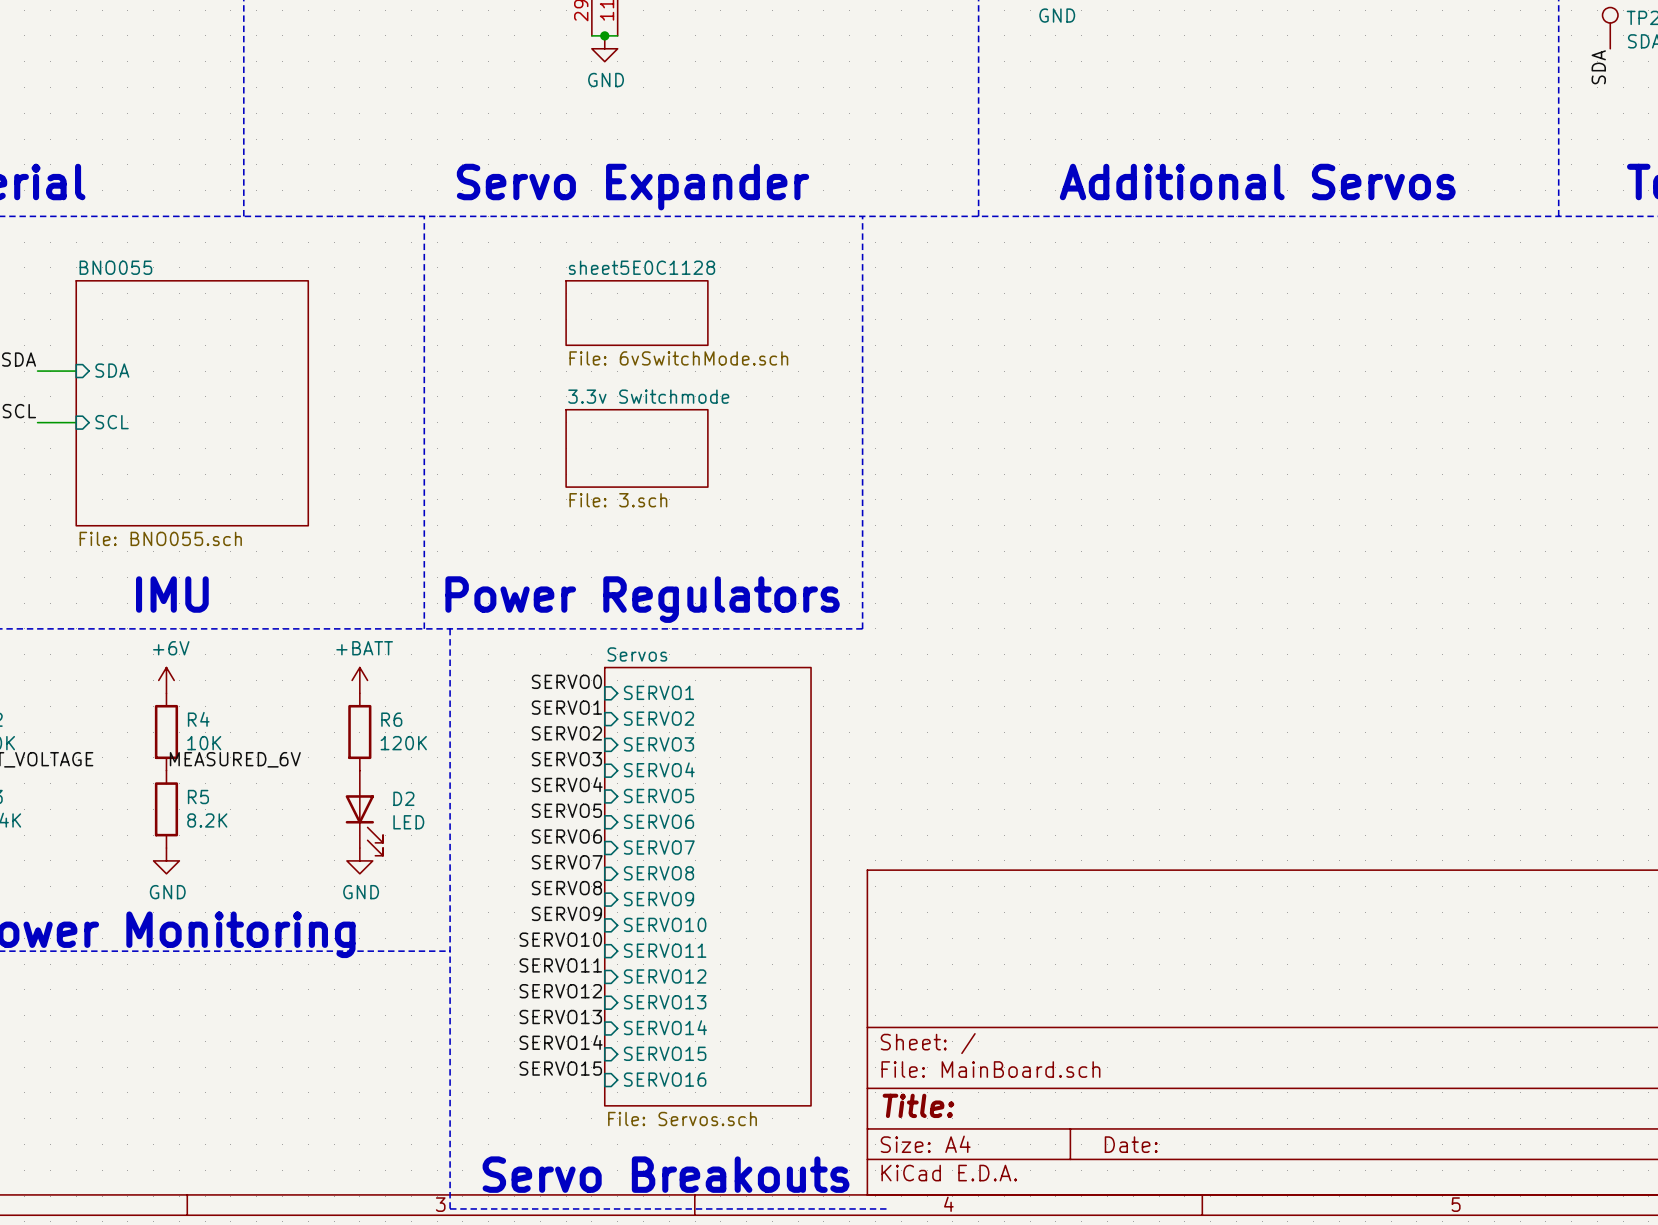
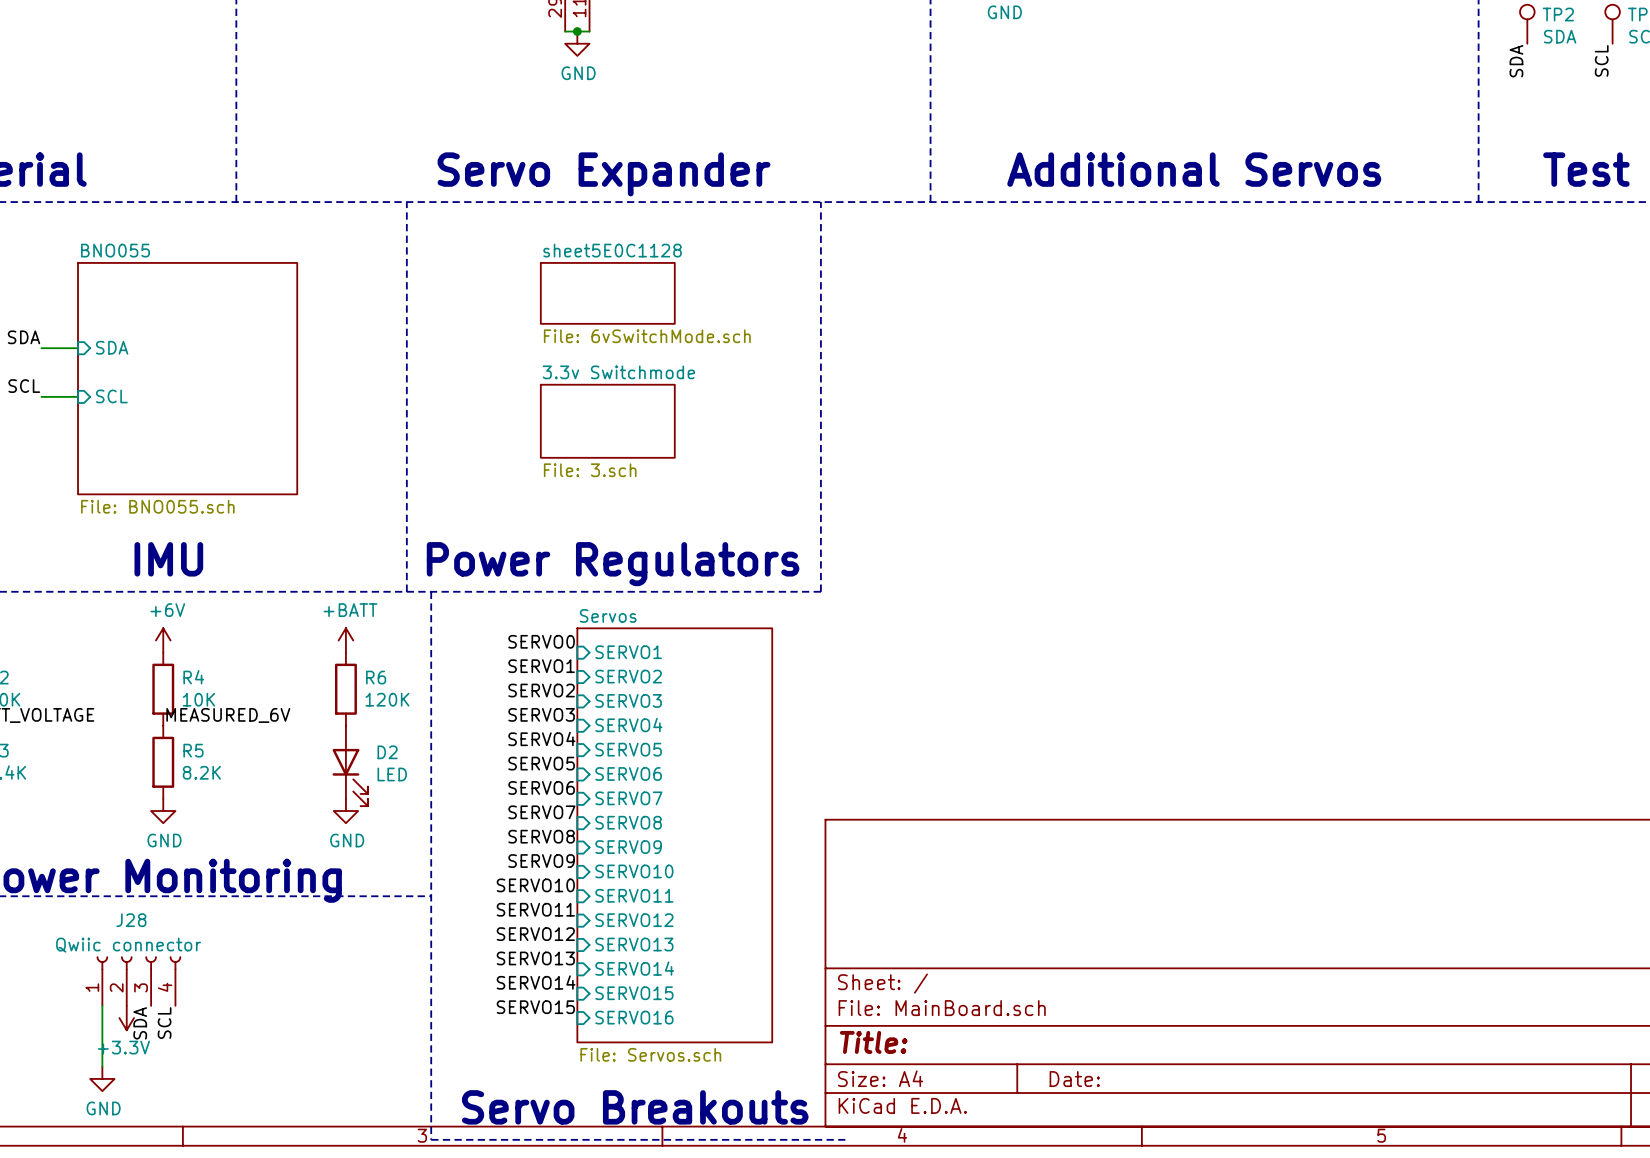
J28: none -> Qwiic connector (138, 981)
wire: none -> (102, 1005) (102, 1066)
power symbol: none -> +3.3V (126, 1018)
label: none -> SDA (140, 1023)
label: none -> SCL (164, 1023)
power symbol: none -> GND (102, 1078)

